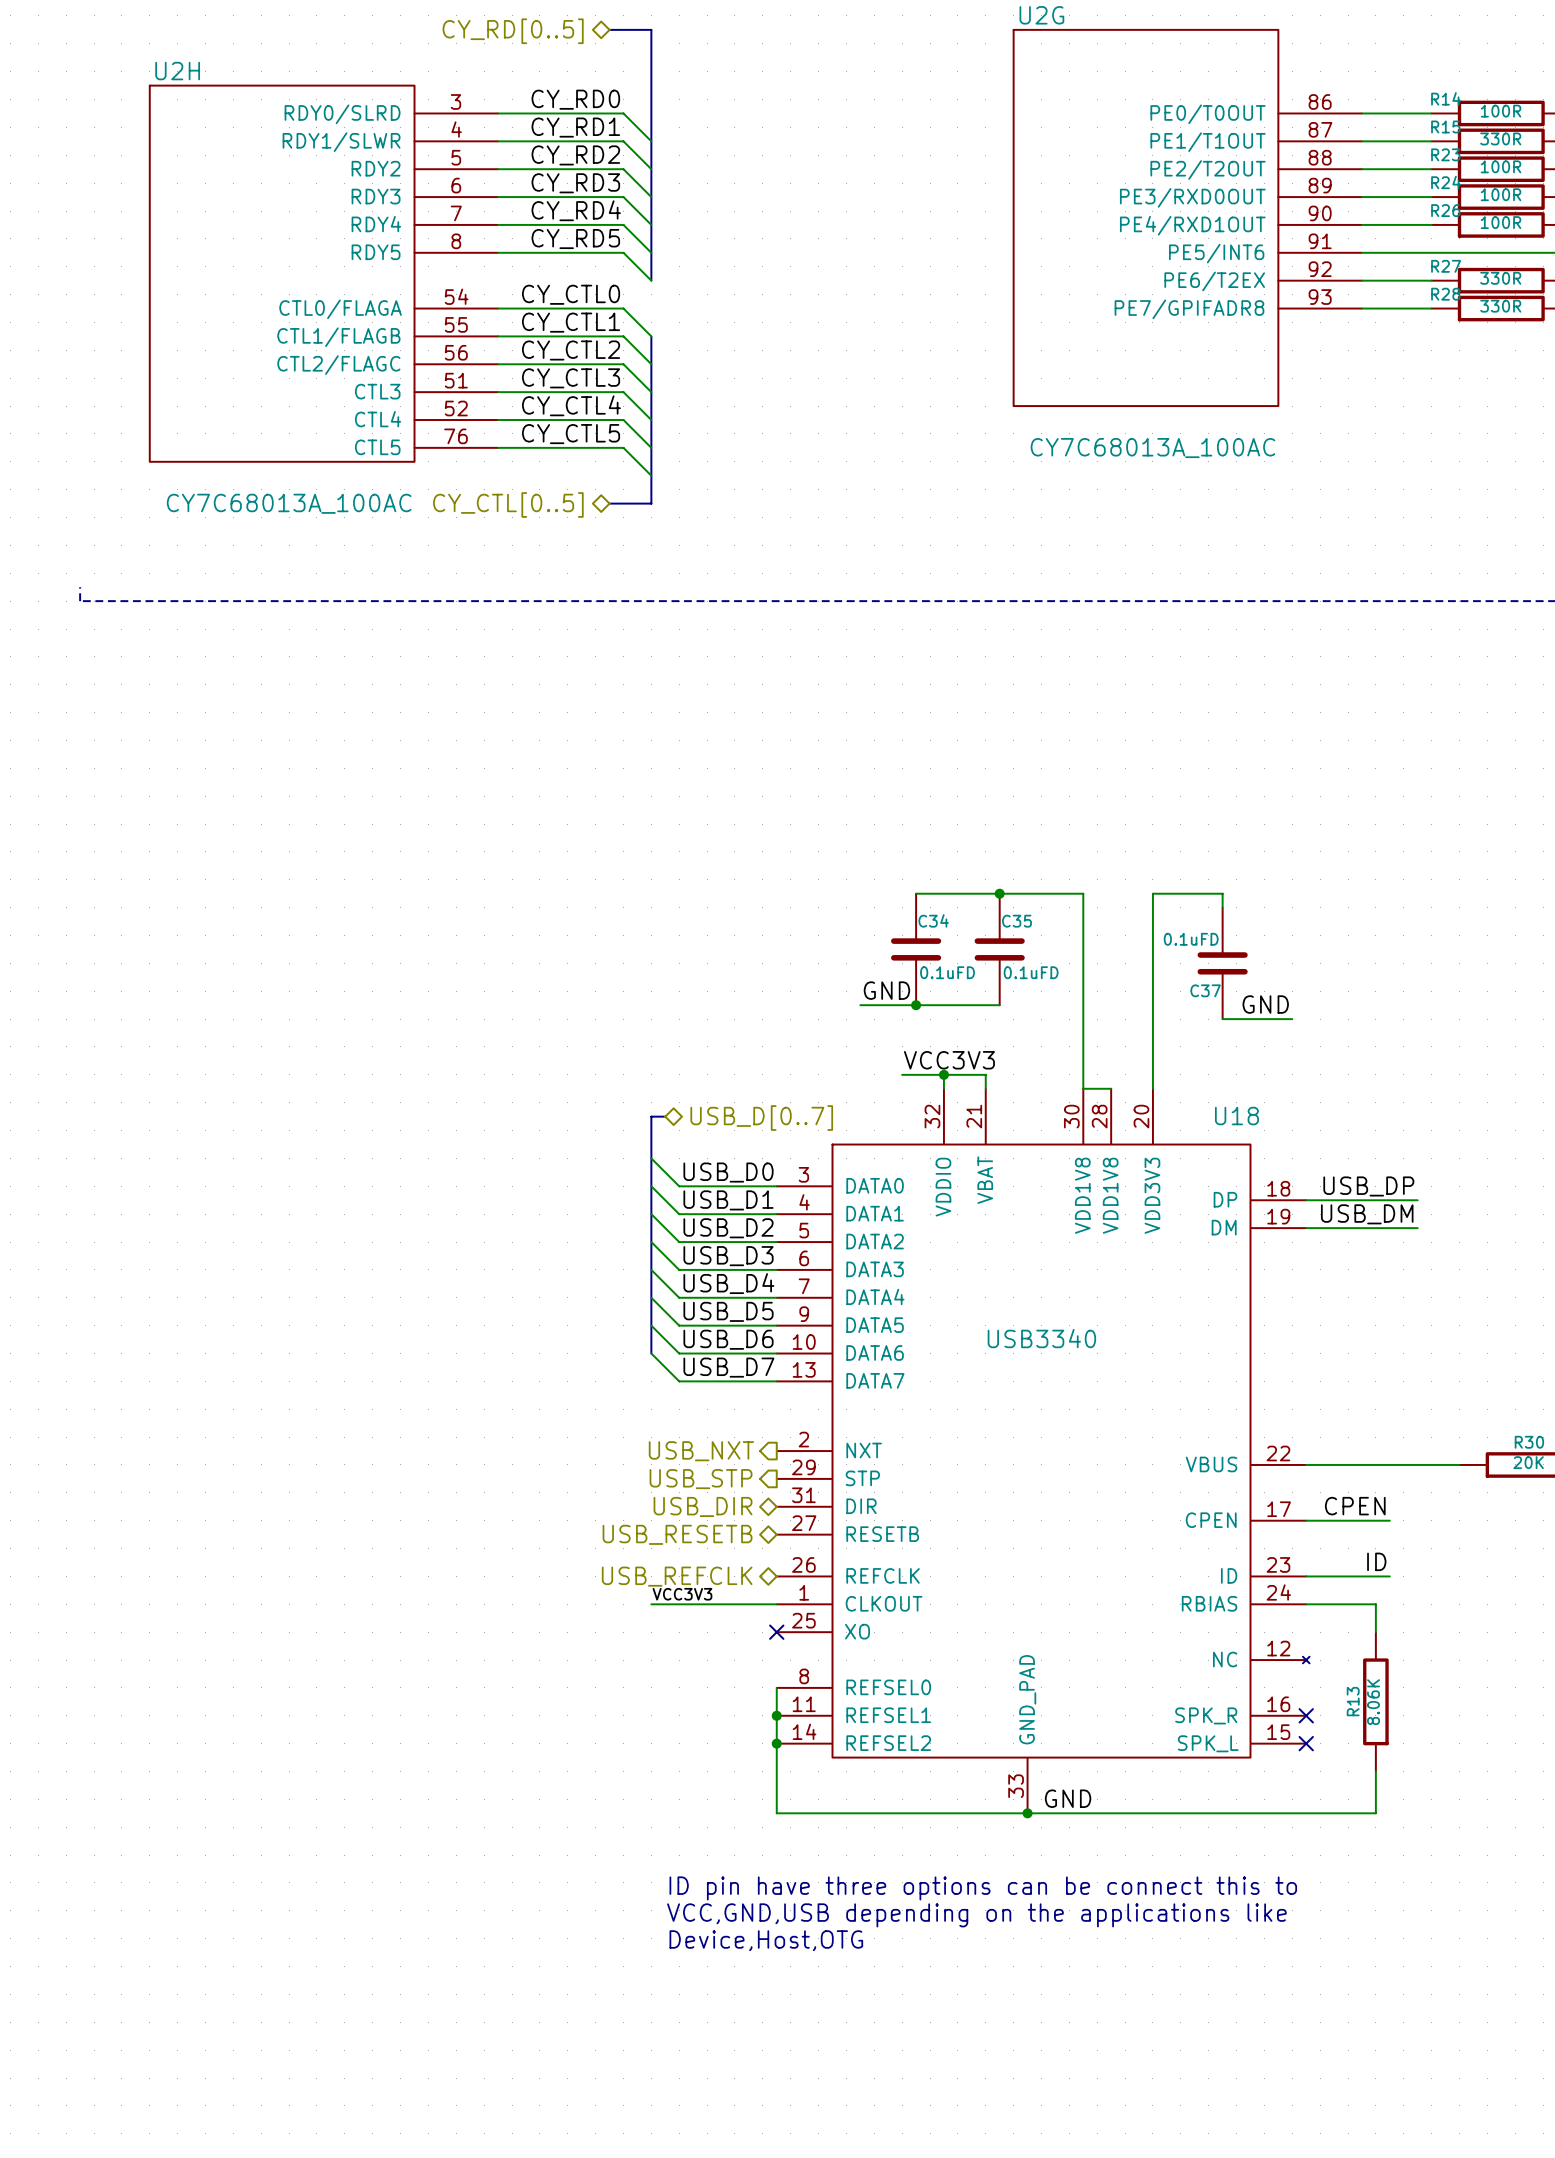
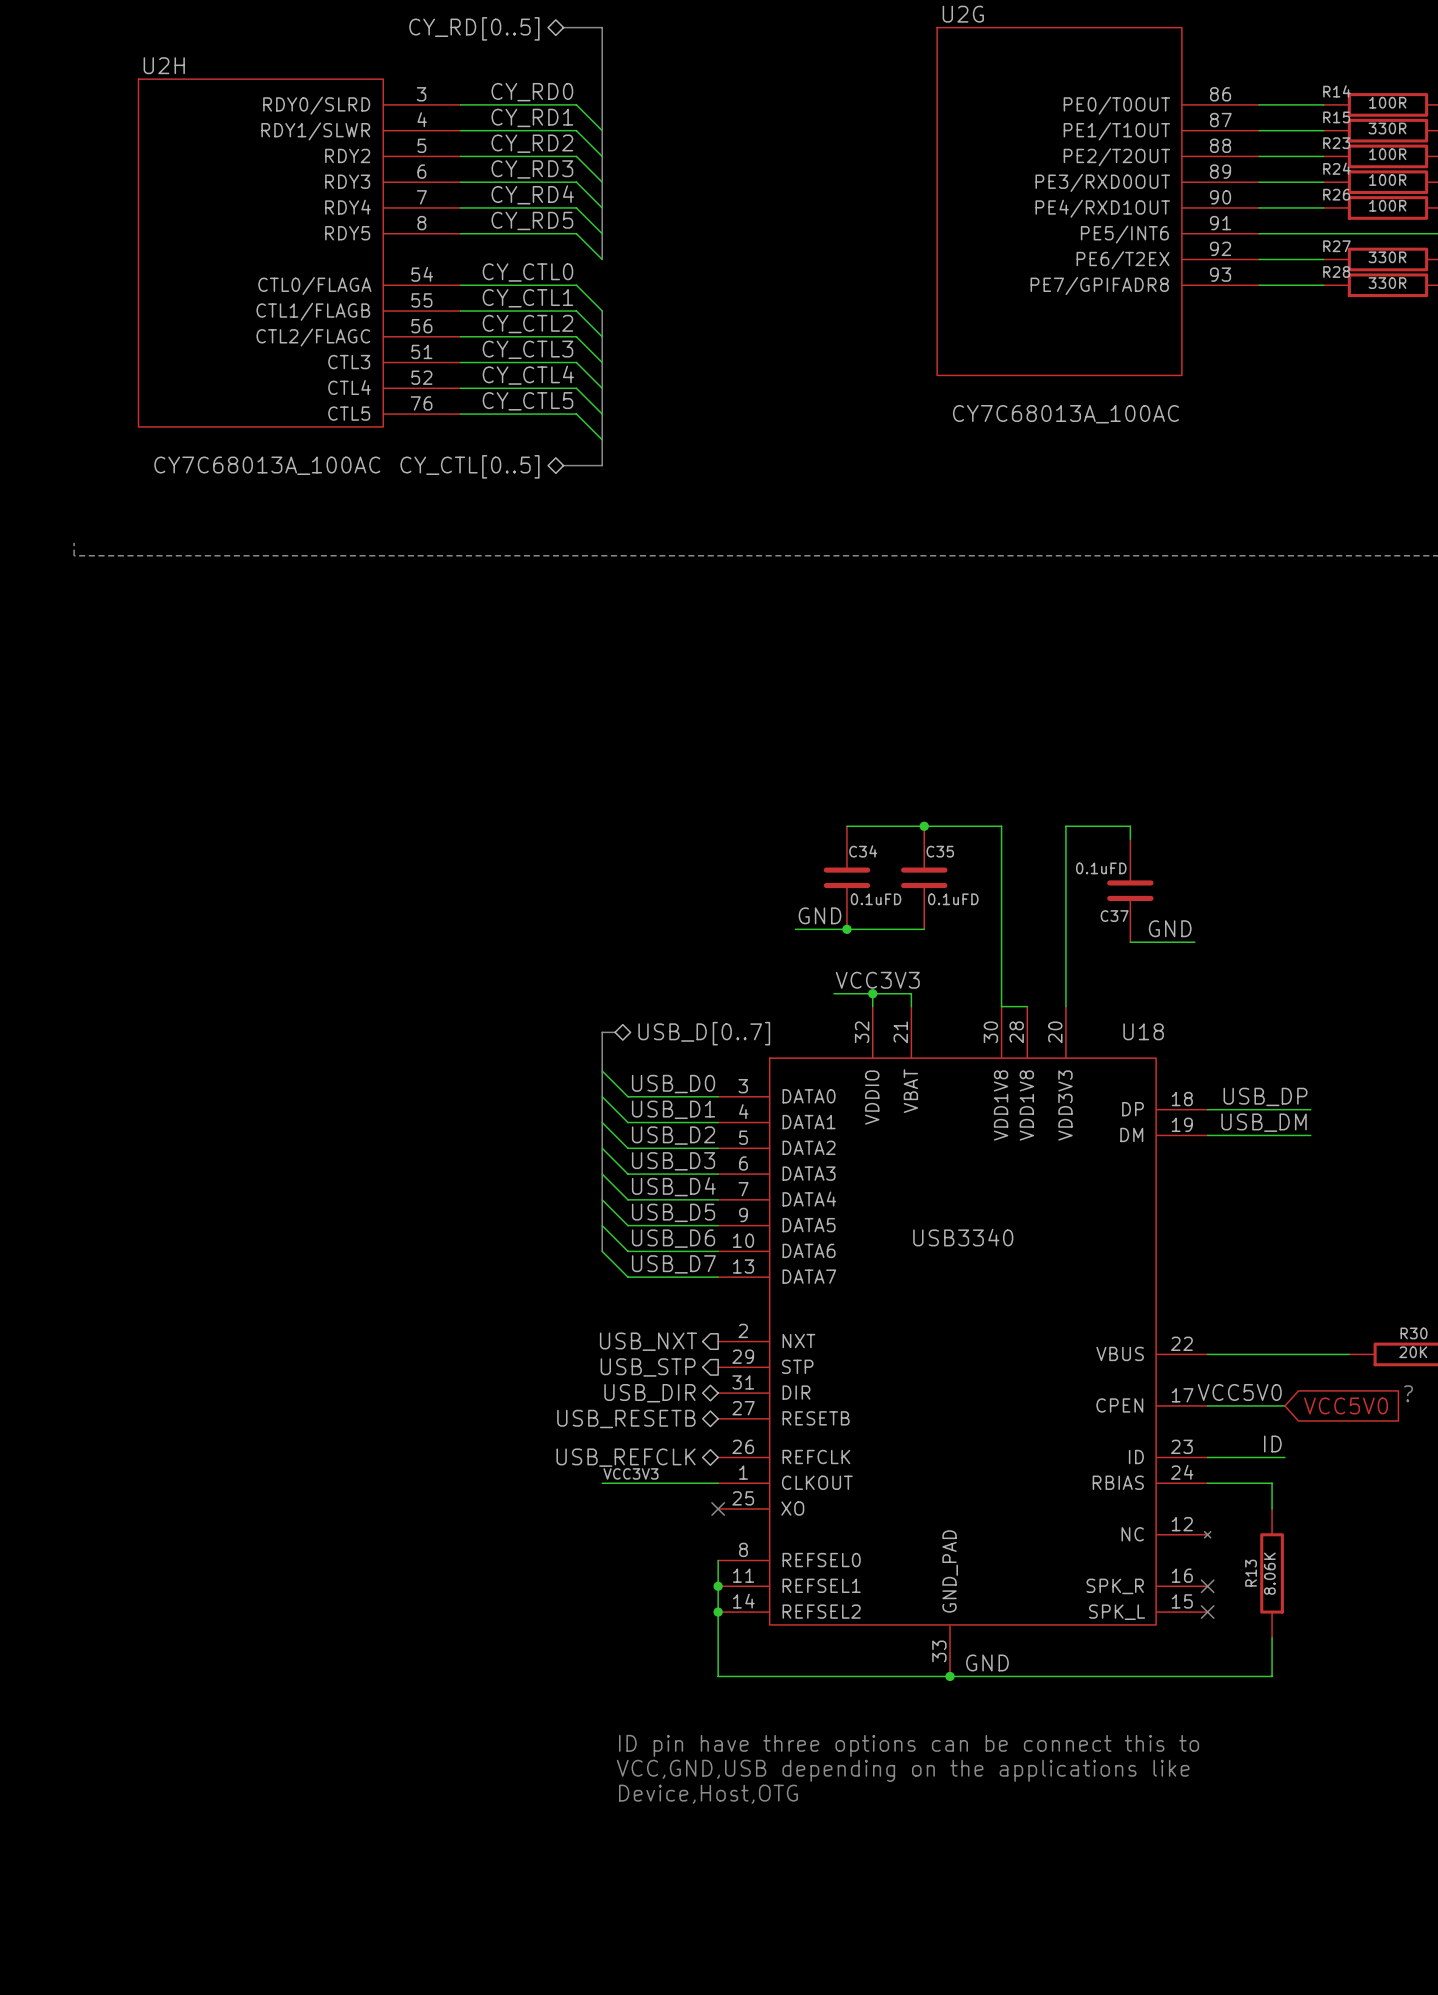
label: CPEN (1355, 1506) -> VCC5V0 (1239, 1392)
text: none -> ? (1408, 1393)
global label: none -> VCC5V0 (1346, 1405)

